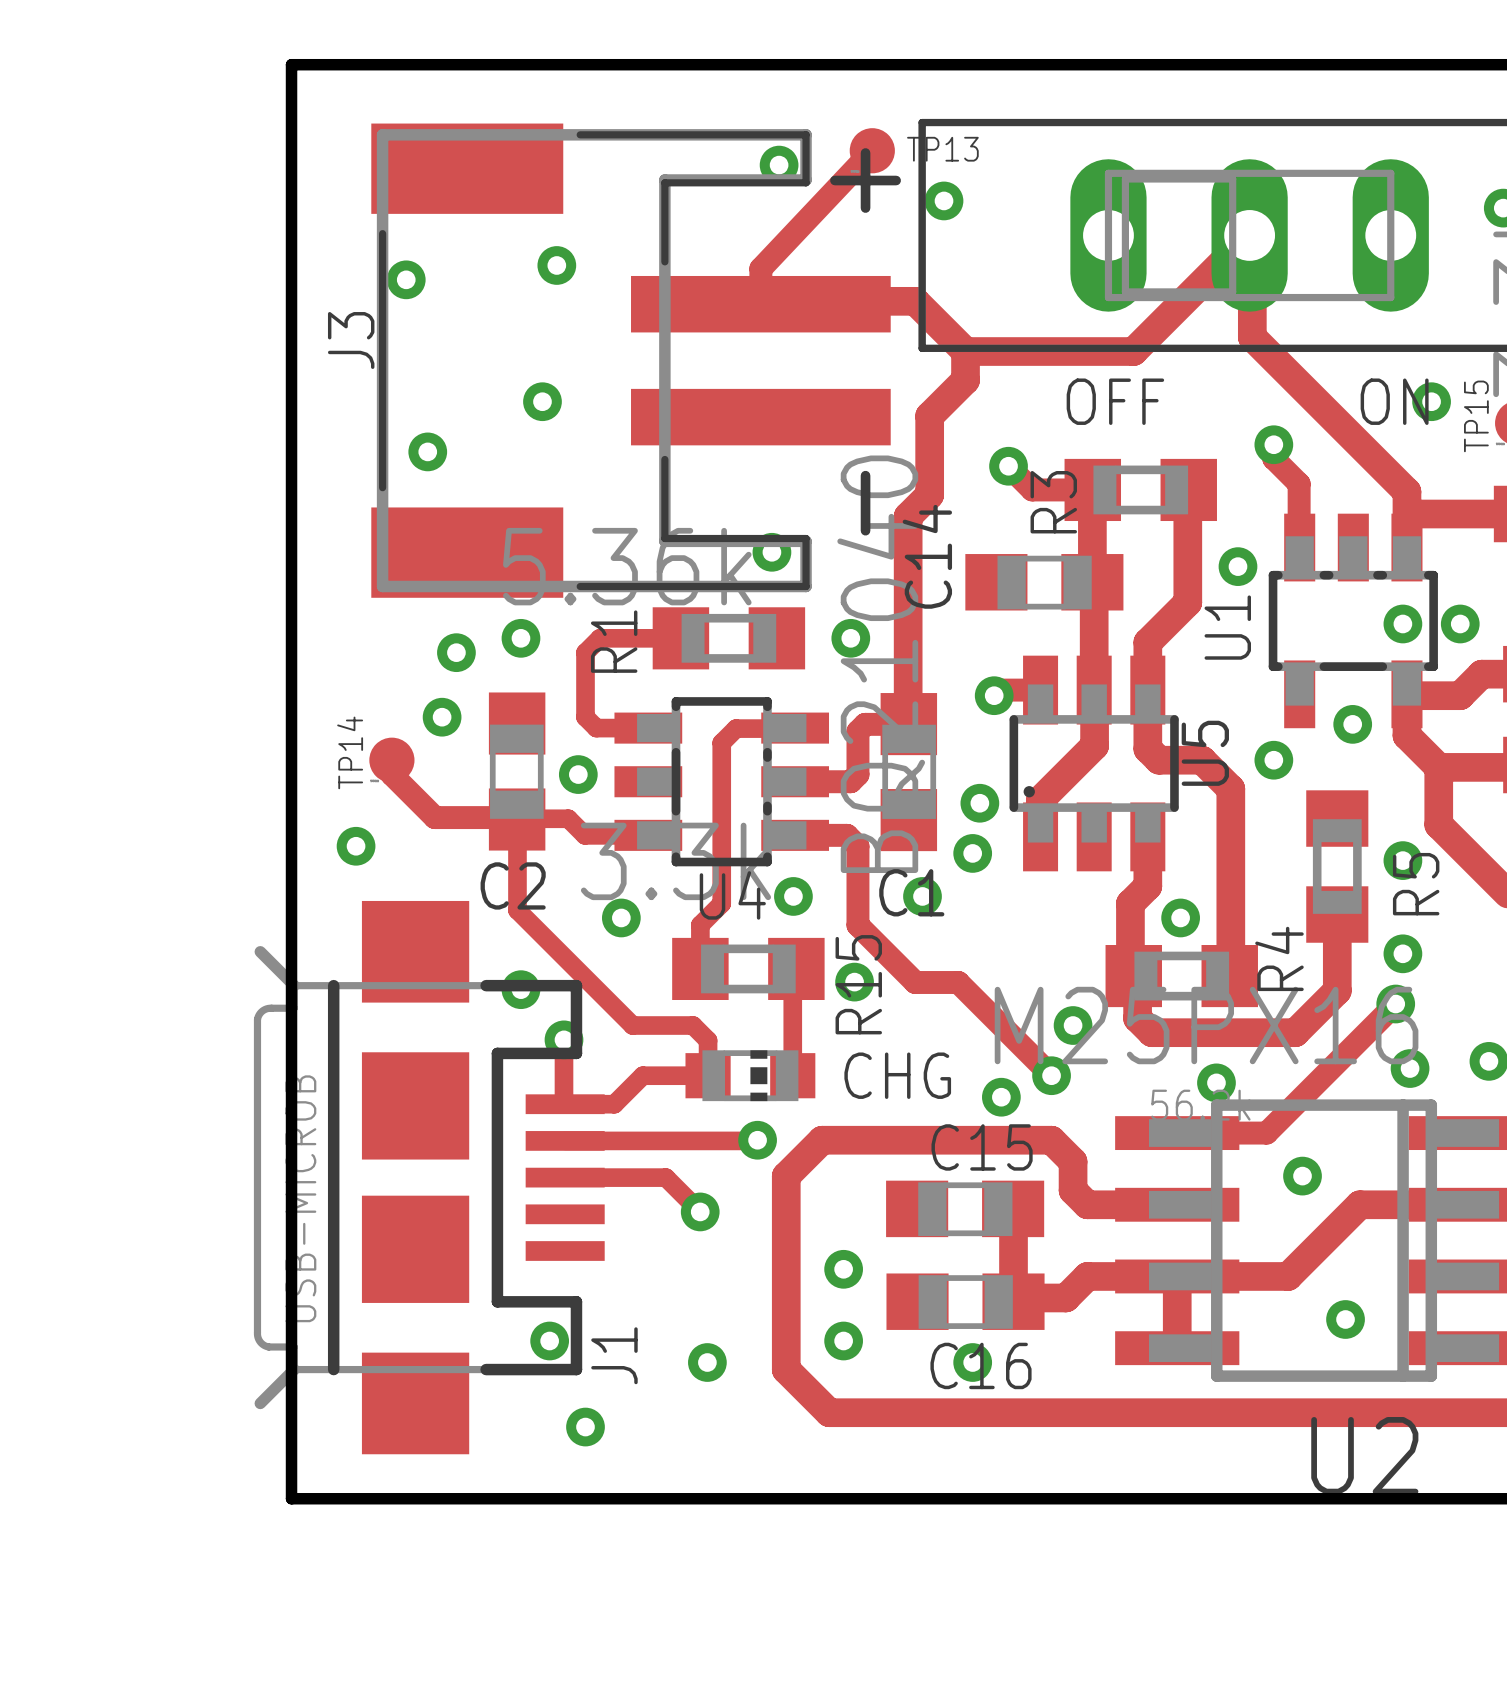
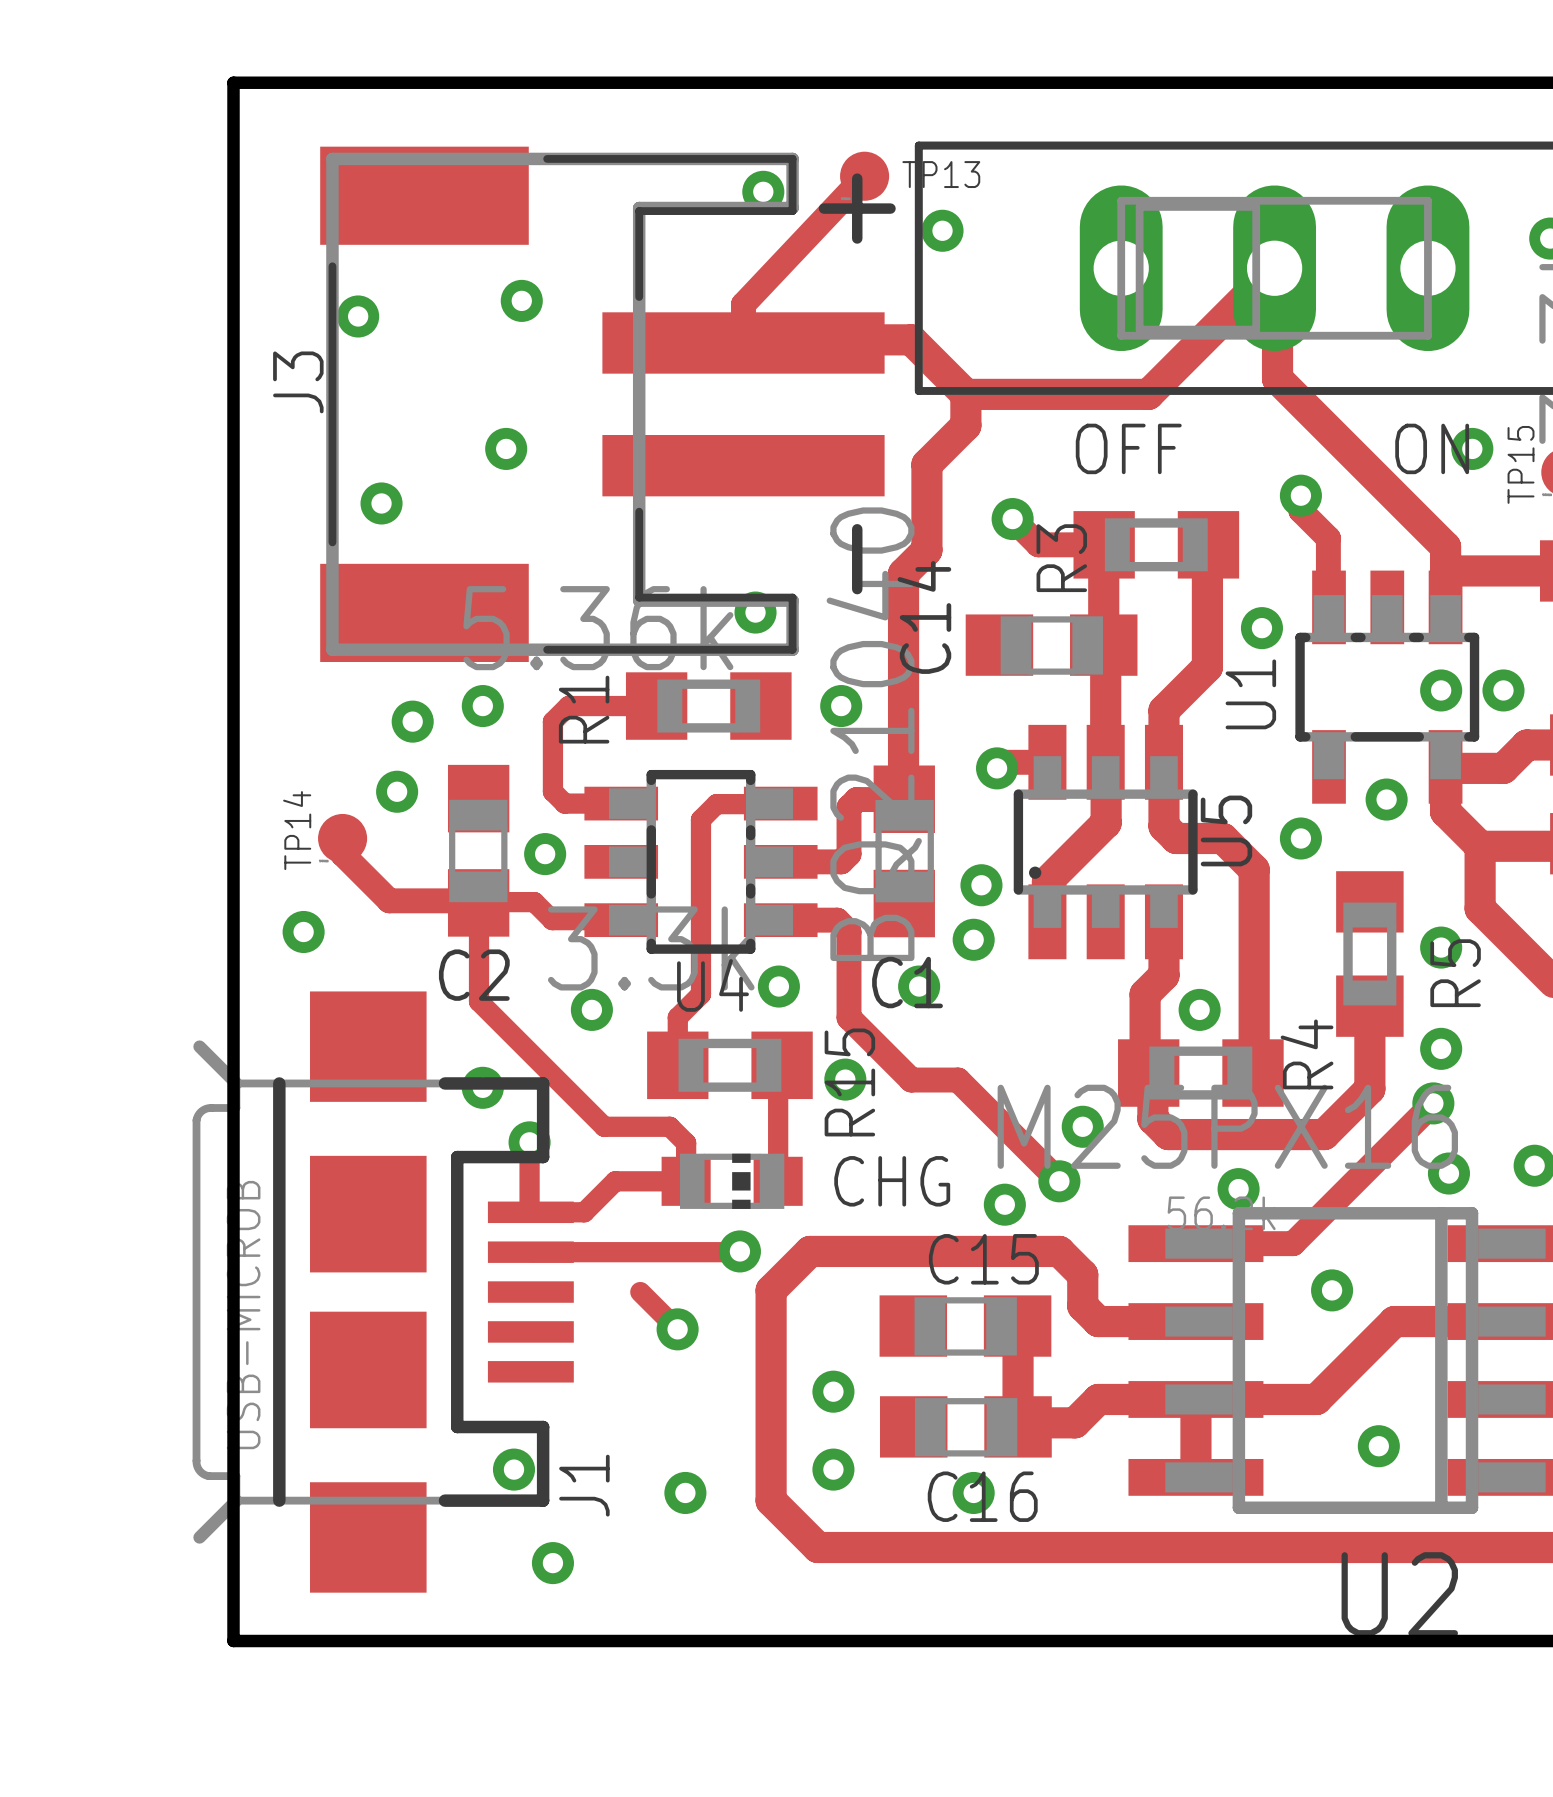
track: (565, 1177) (665, 1177) -> none

